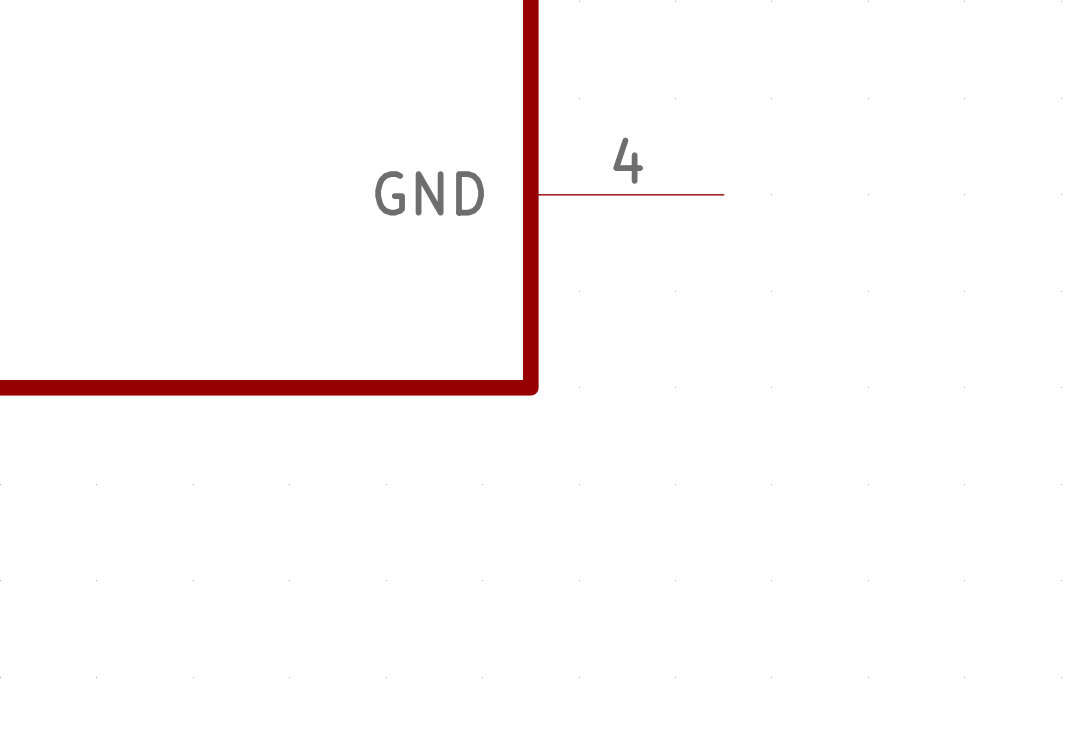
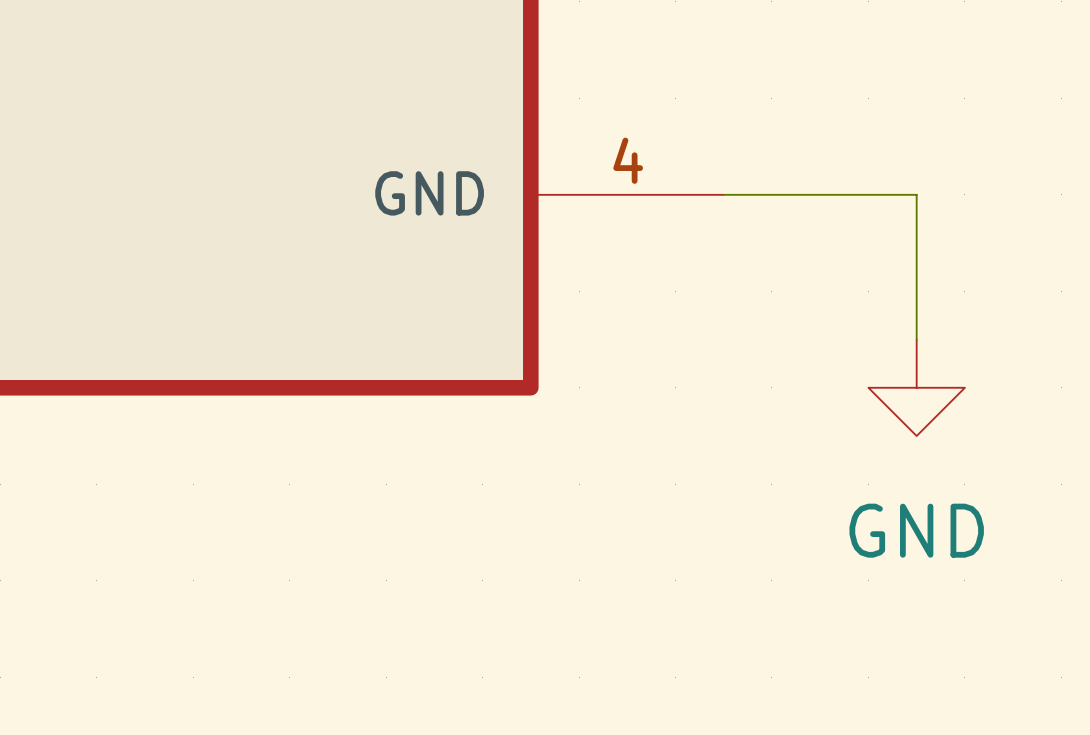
wire: none -> (723, 194) (916, 194) (916, 339)
power symbol: none -> GND (916, 387)

